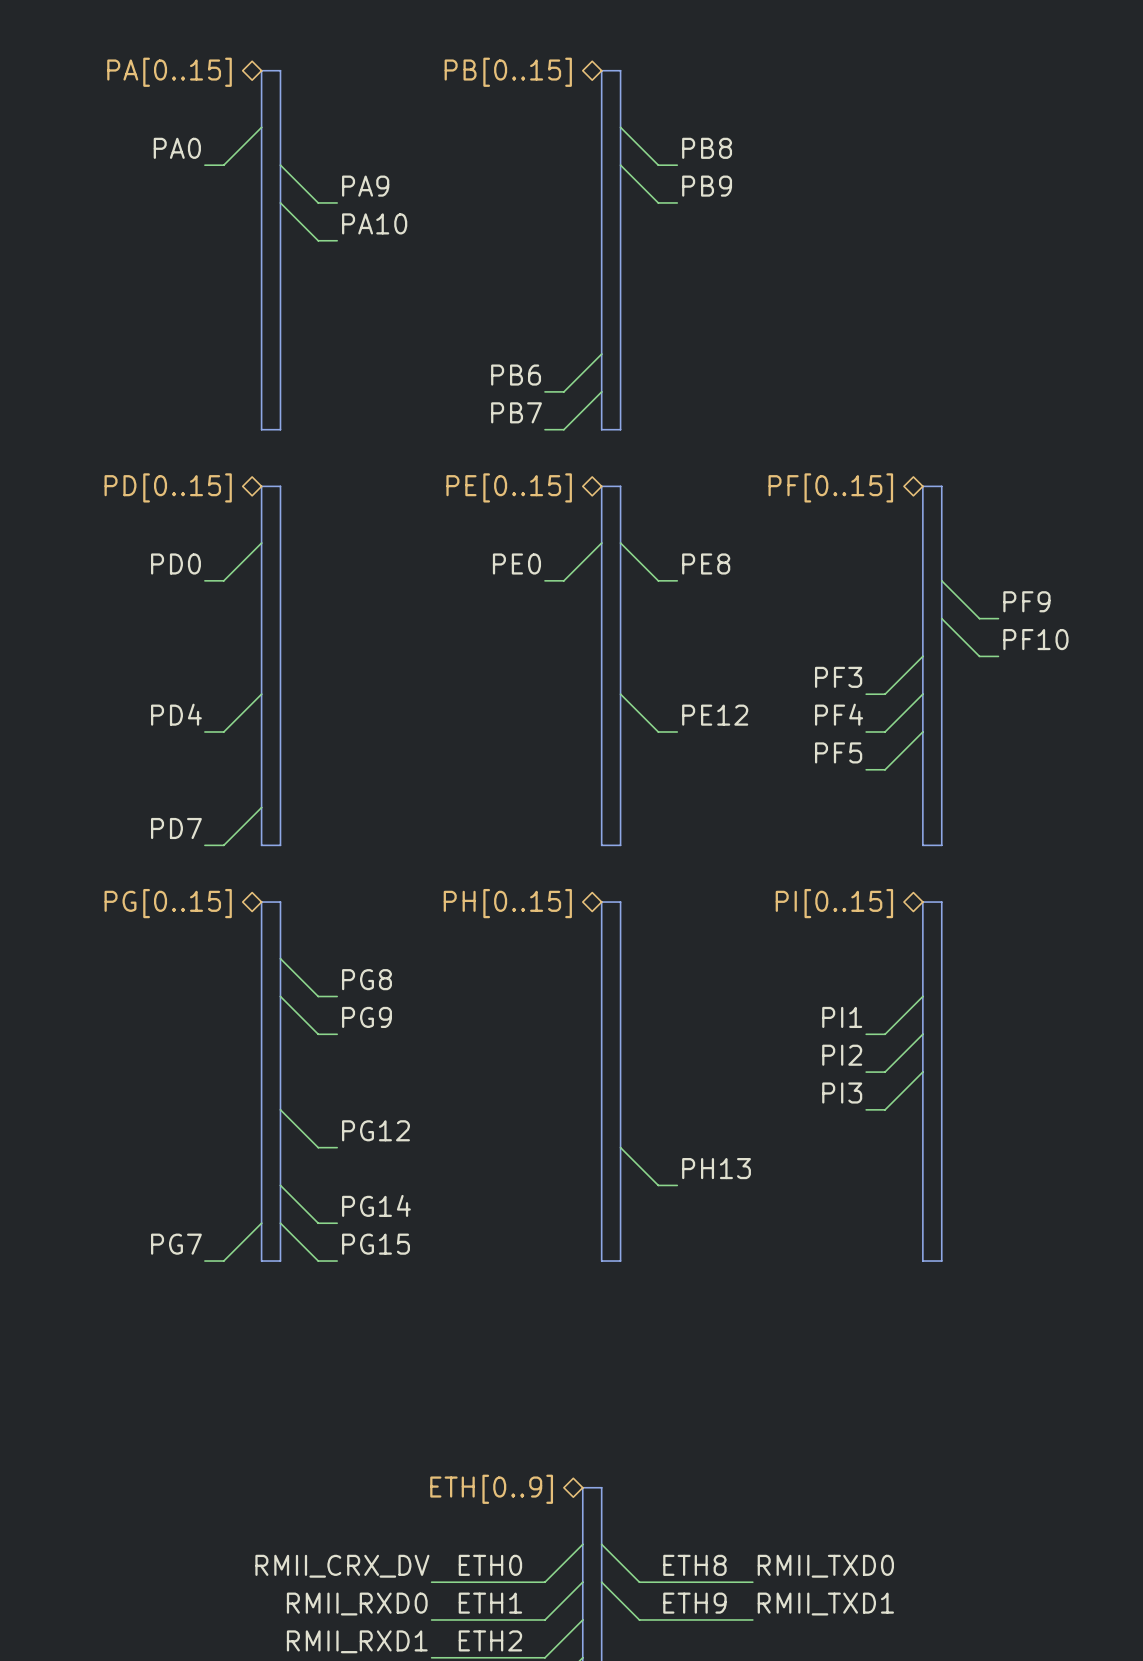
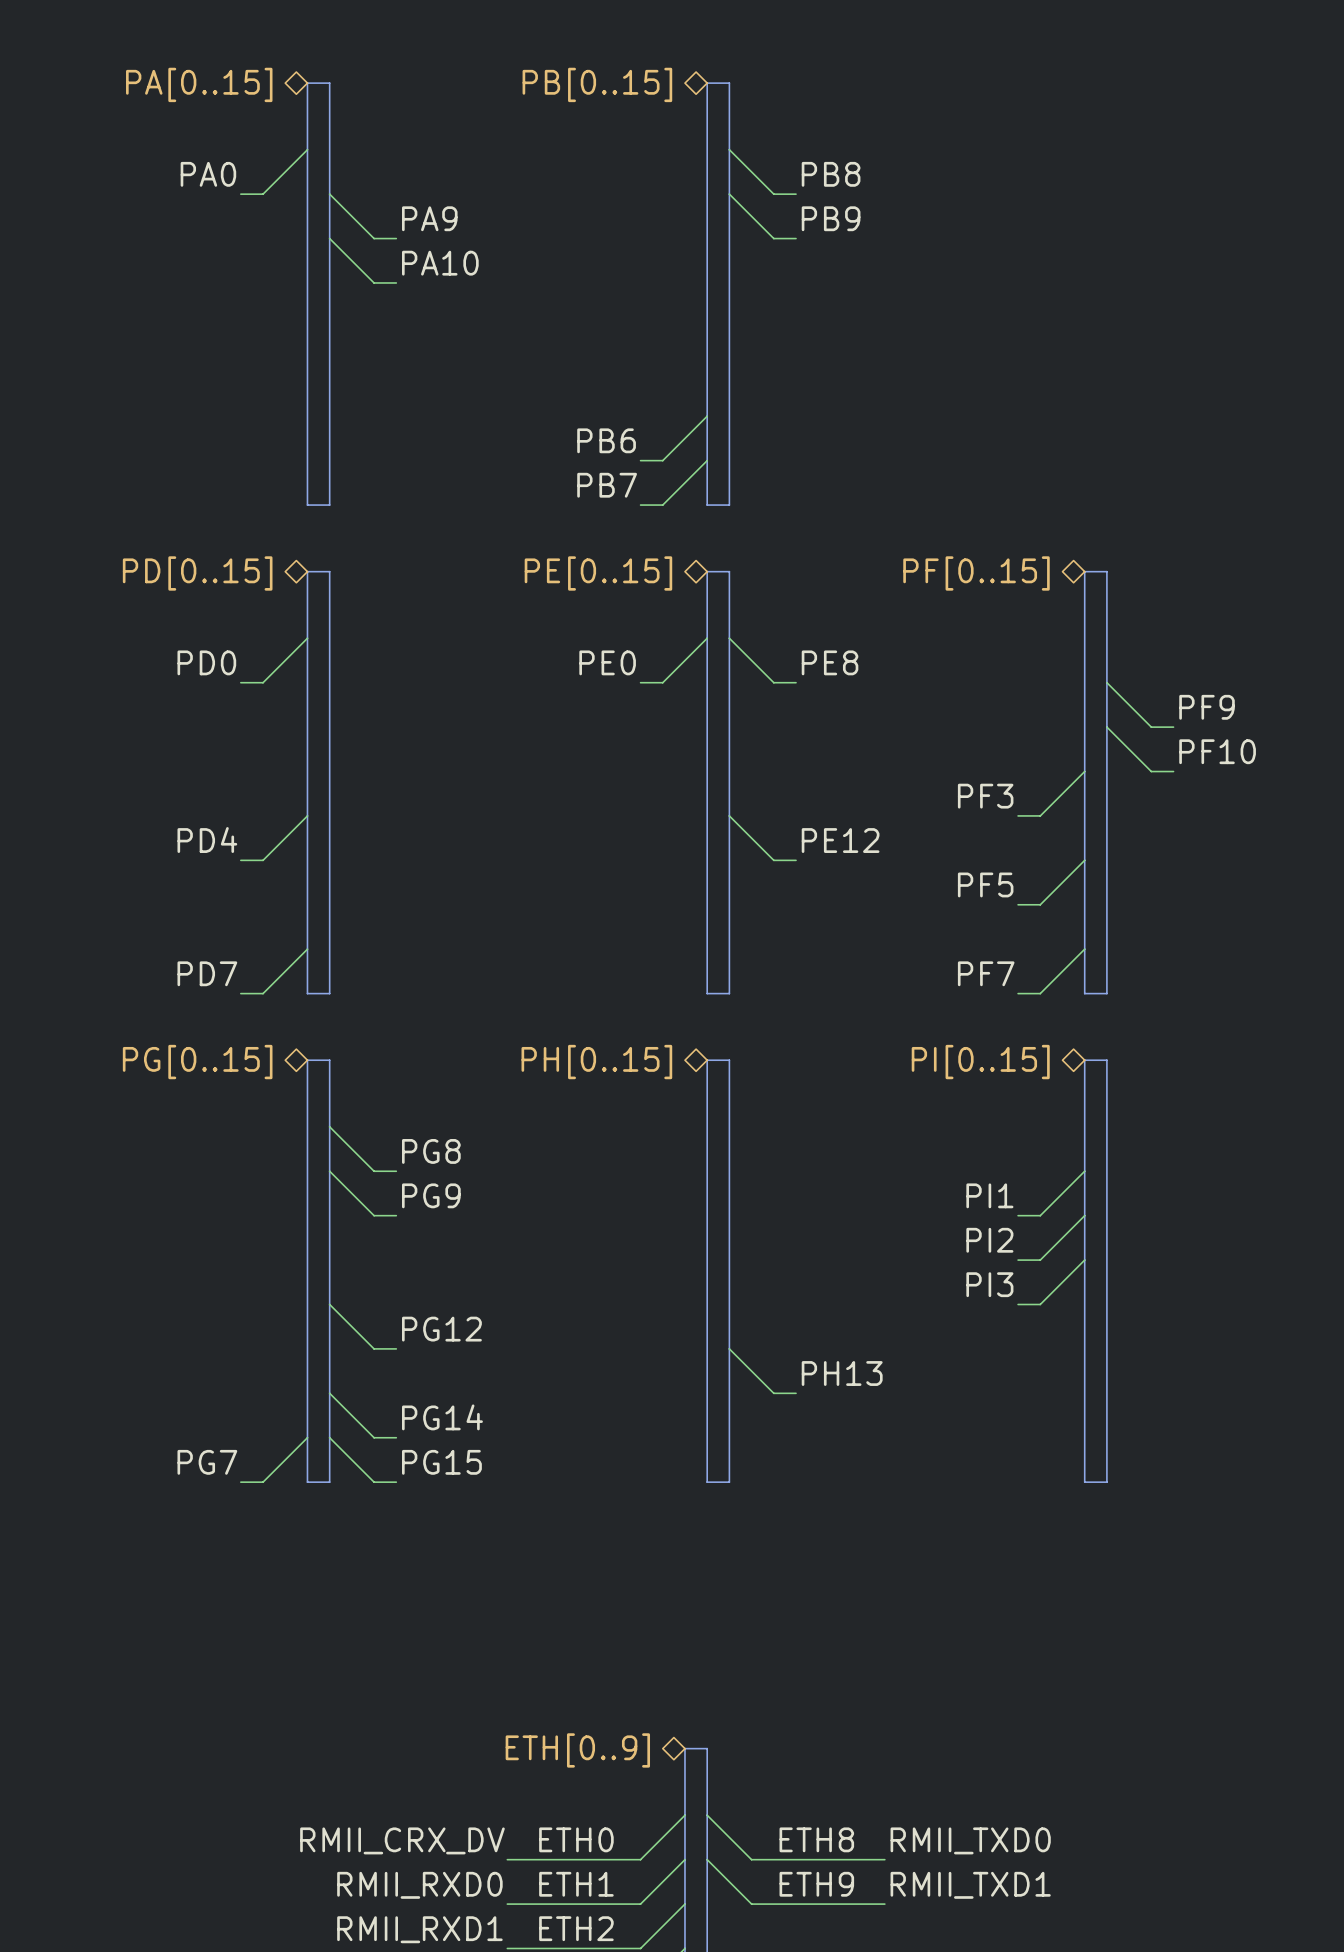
wire: (922, 694) (885, 731) (866, 731) -> (1084, 949) (1040, 993) (1018, 993)
label: PF4 (839, 714) -> none
label: none -> PF7 (986, 973)

